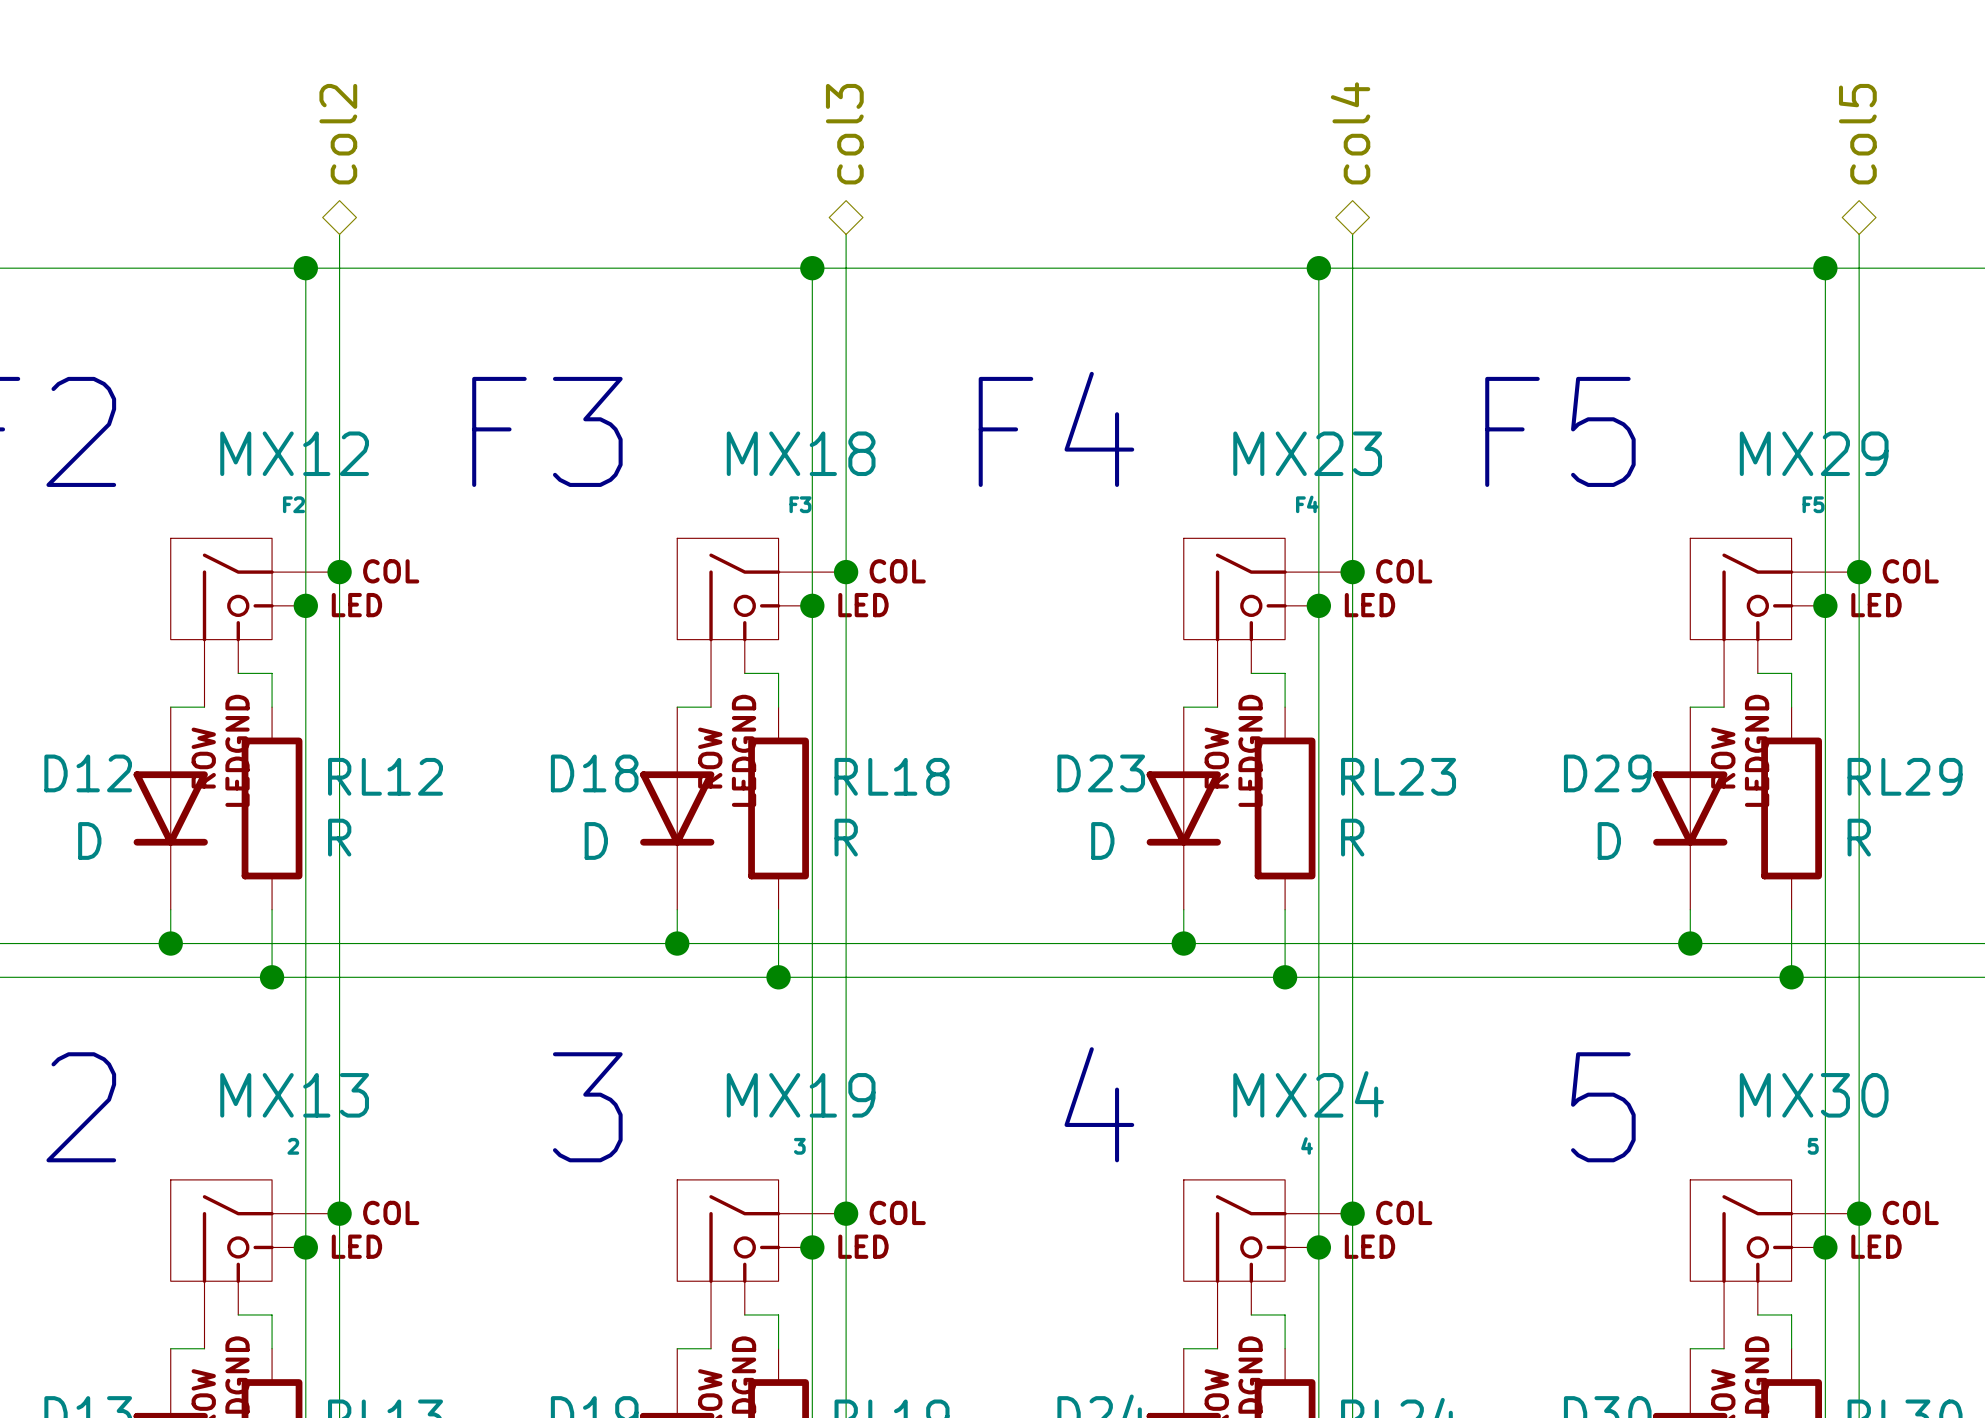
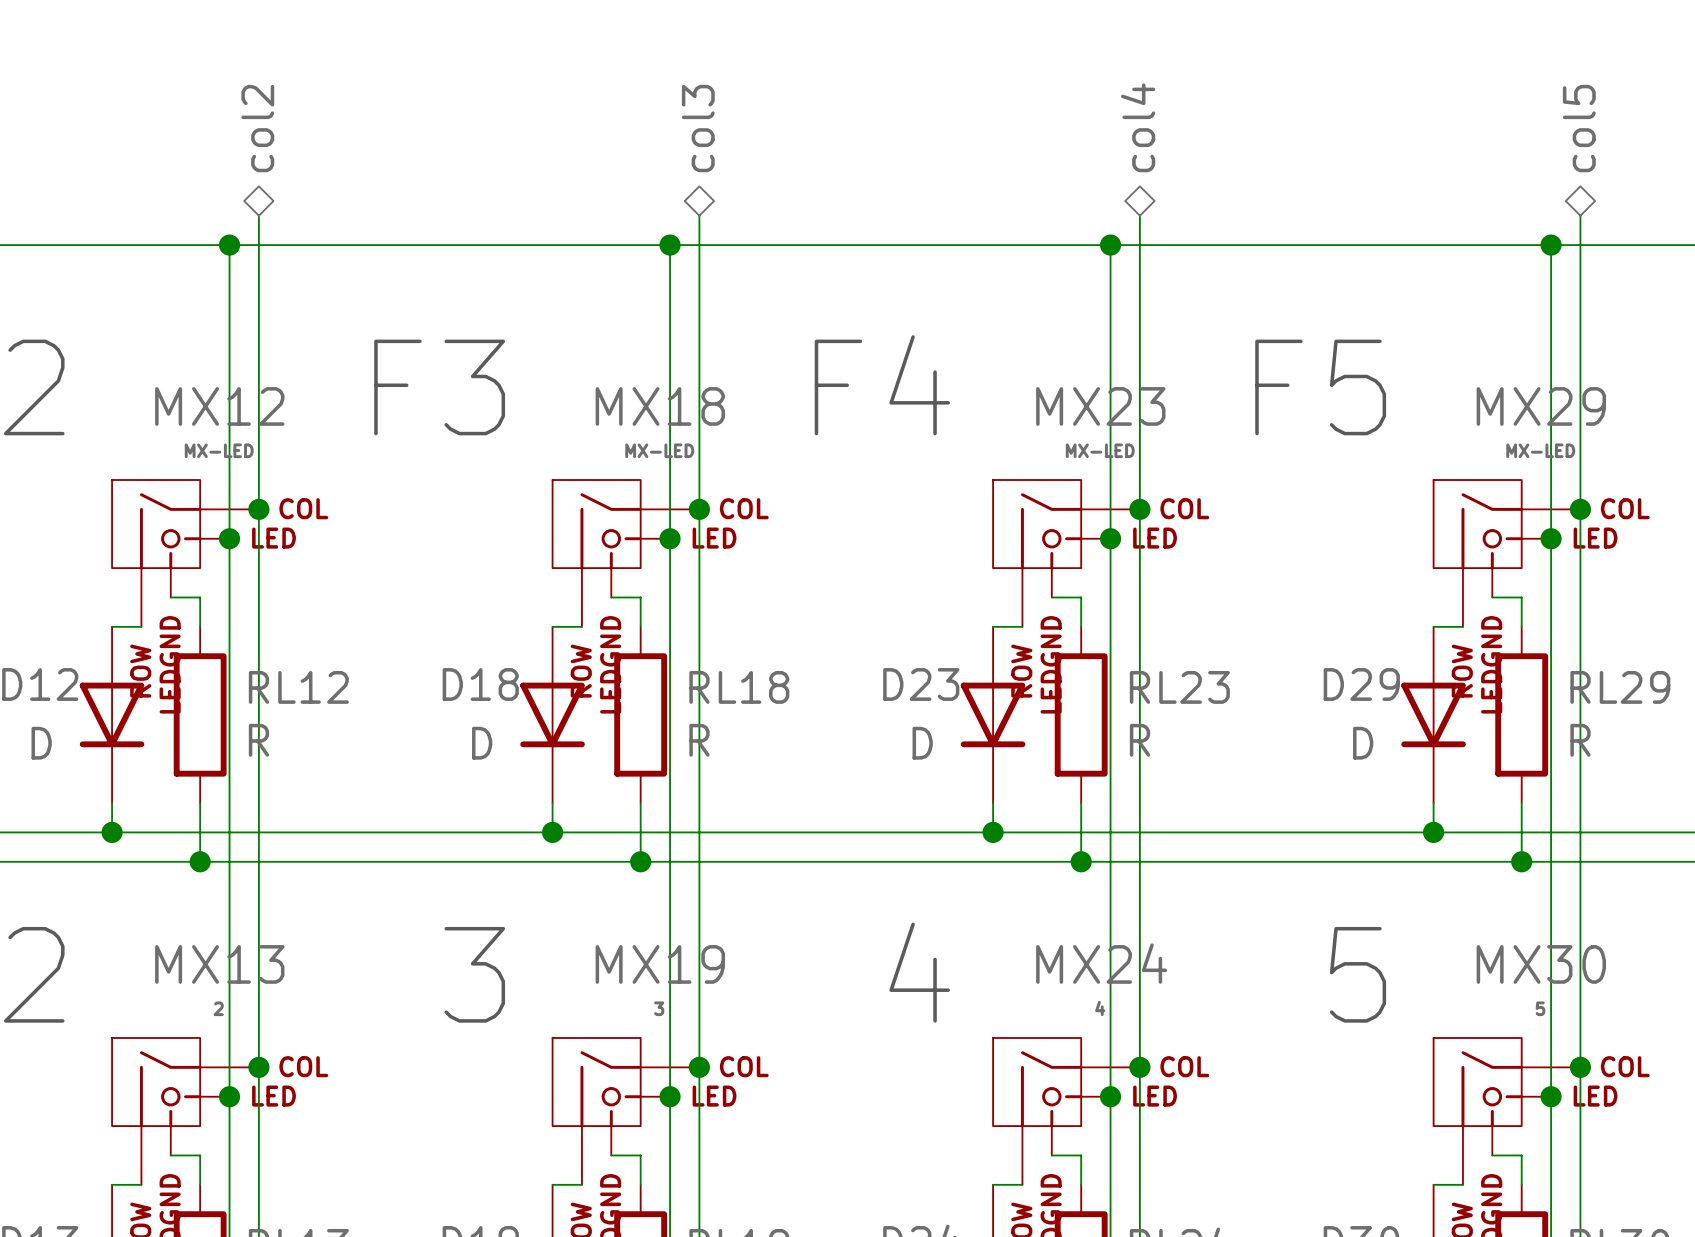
MX12 value: F2 (293, 504) -> MX-LED (219, 450)
MX18 value: F3 (800, 504) -> MX-LED (659, 450)
MX23 value: F4 (1307, 504) -> MX-LED (1100, 450)
MX29 value: F5 (1813, 504) -> MX-LED (1540, 450)

